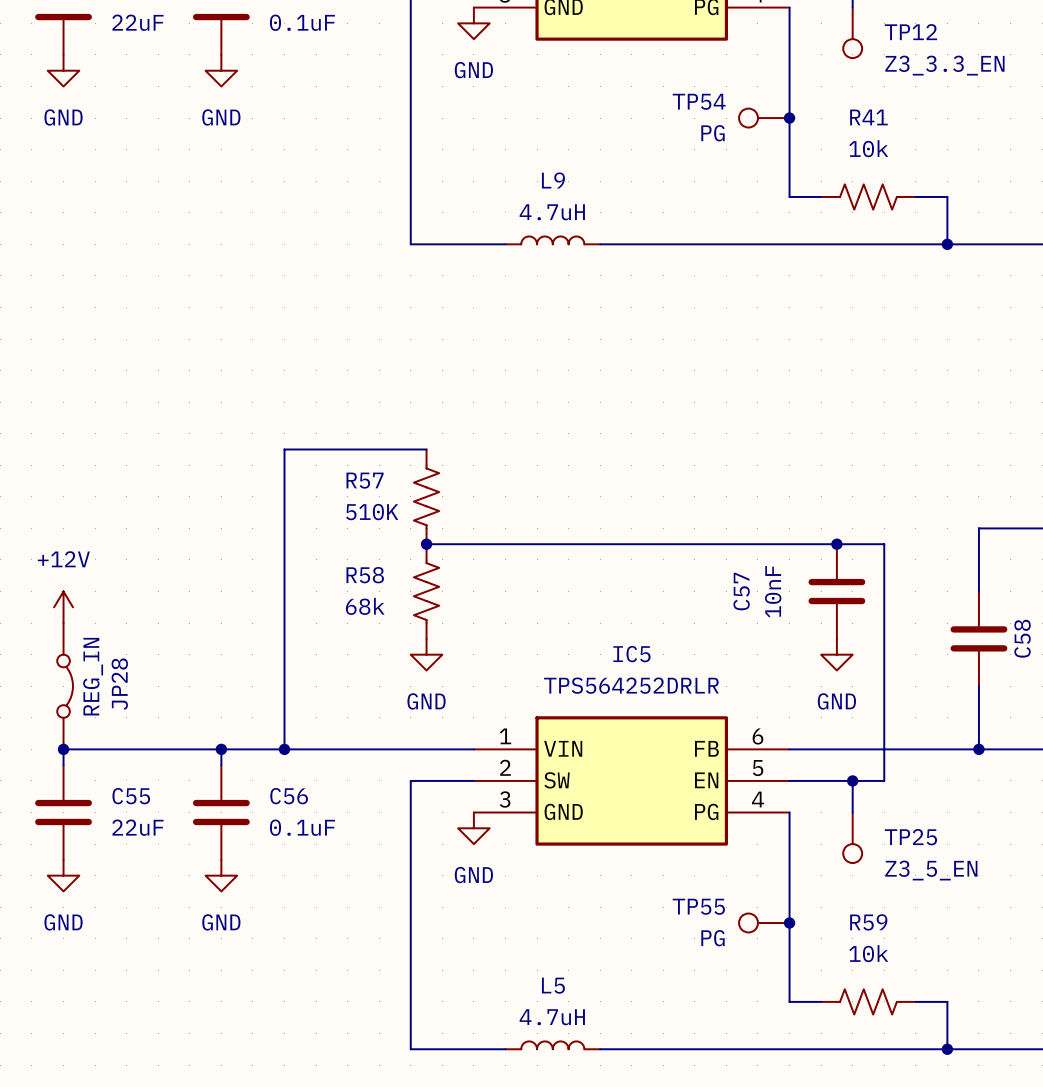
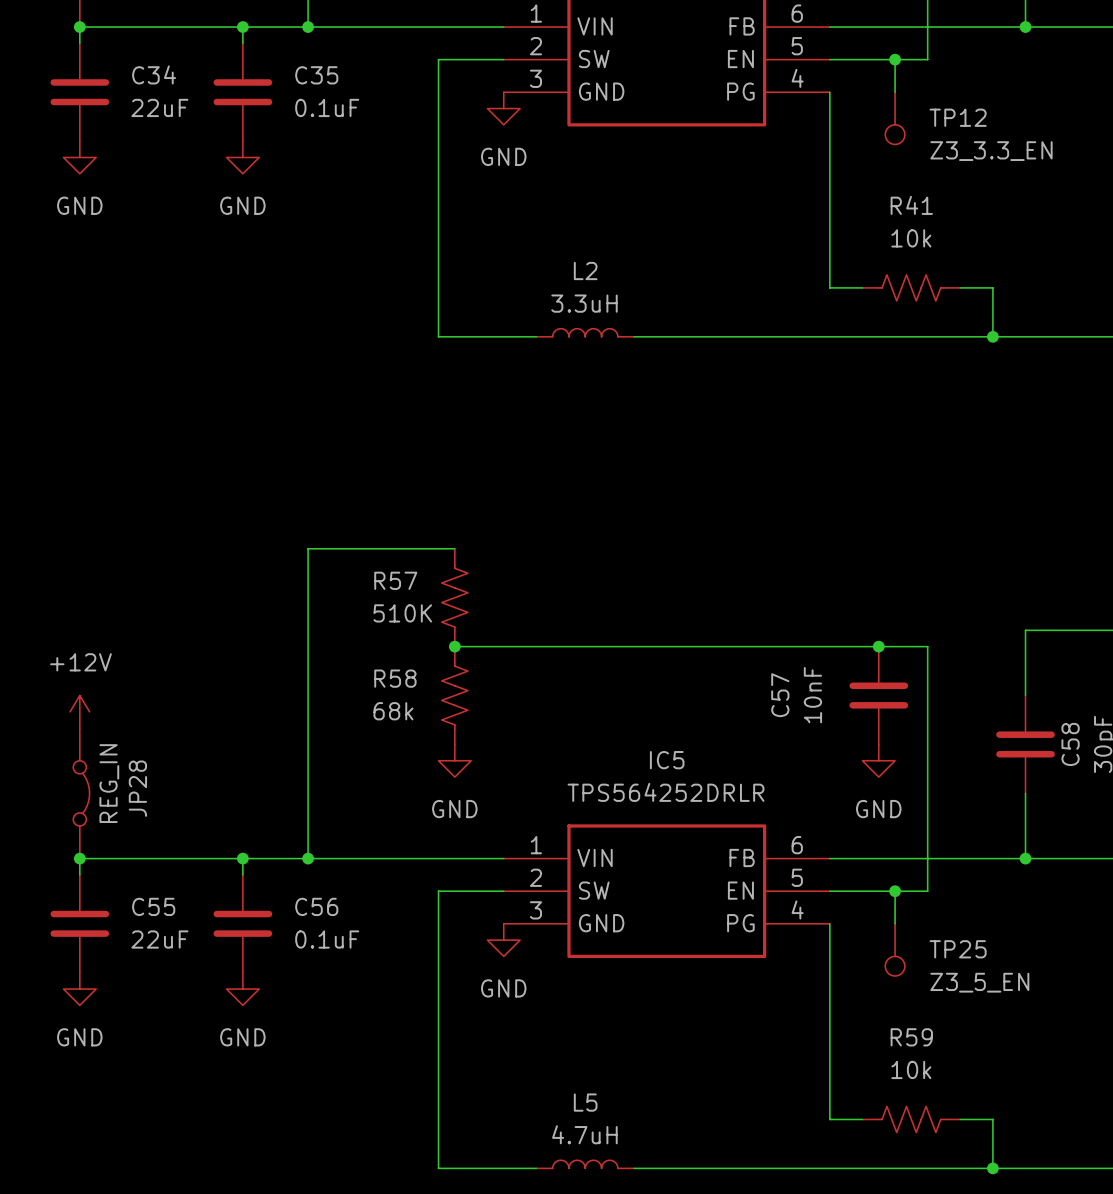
TP54: PG (764, 118) -> none
junction: (789, 118) -> none
L9 name: L9 (553, 180) -> L2 (585, 271)
L9 value: 4.7uH (552, 212) -> 3.3uH (584, 303)
TP55: PG (764, 922) -> none
junction: (789, 922) -> none

